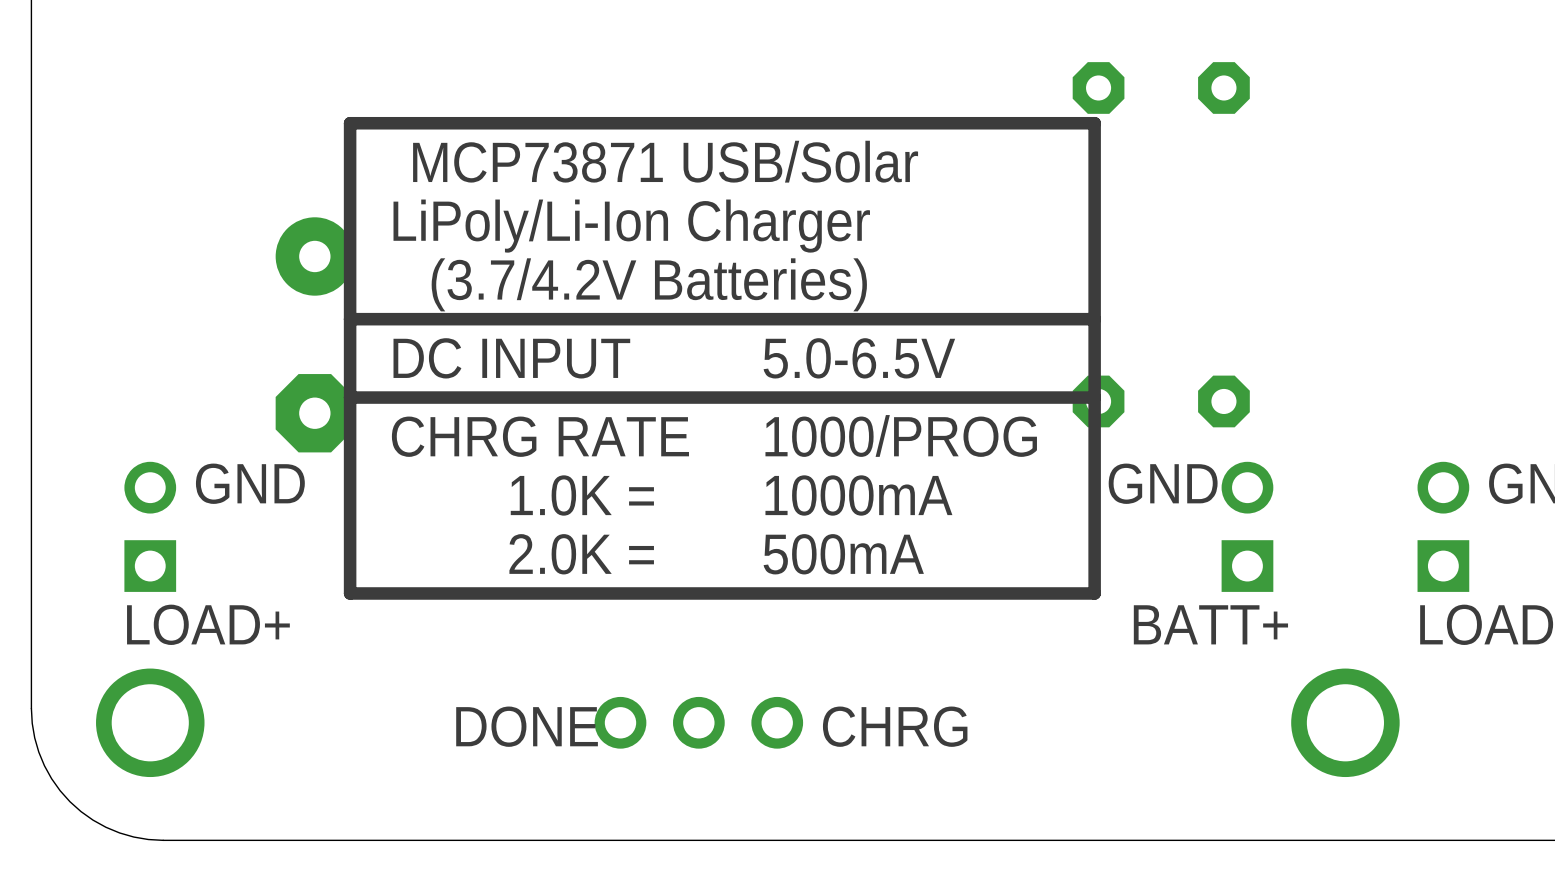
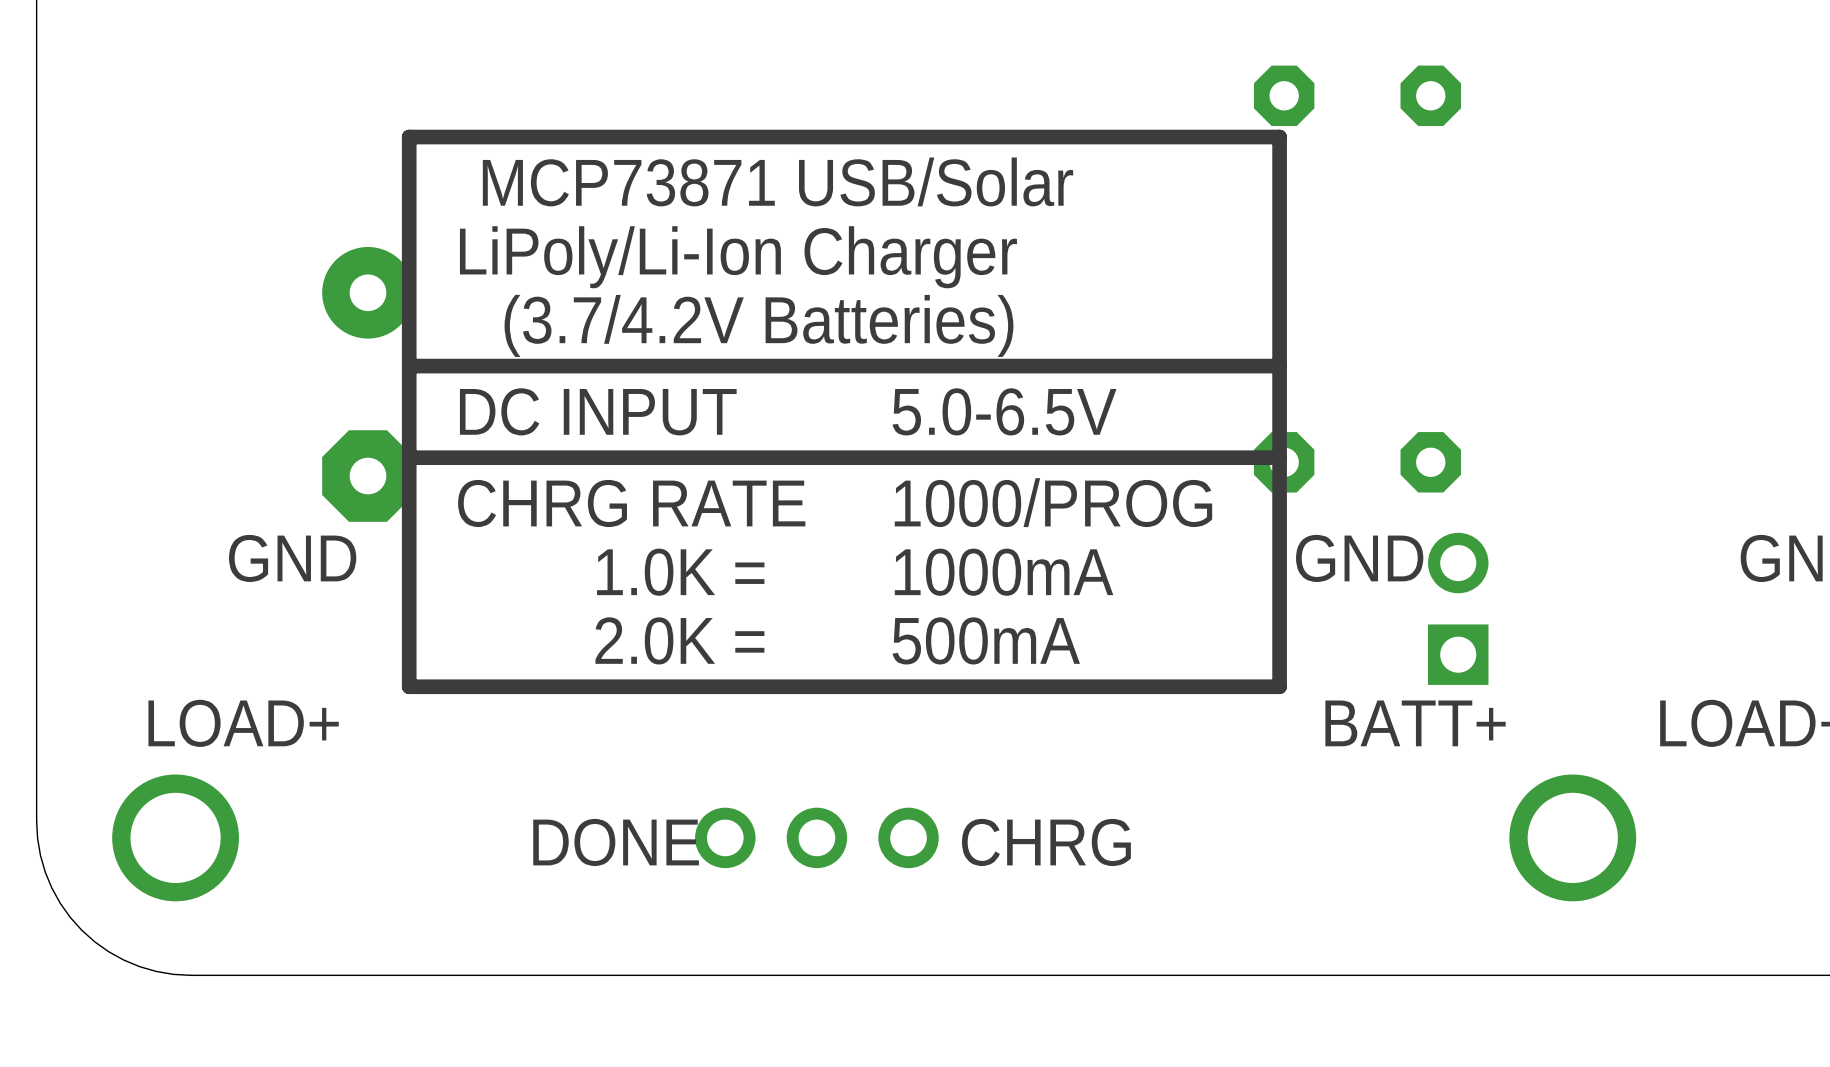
part: (150, 526) -> none
part: (1443, 526) -> none

